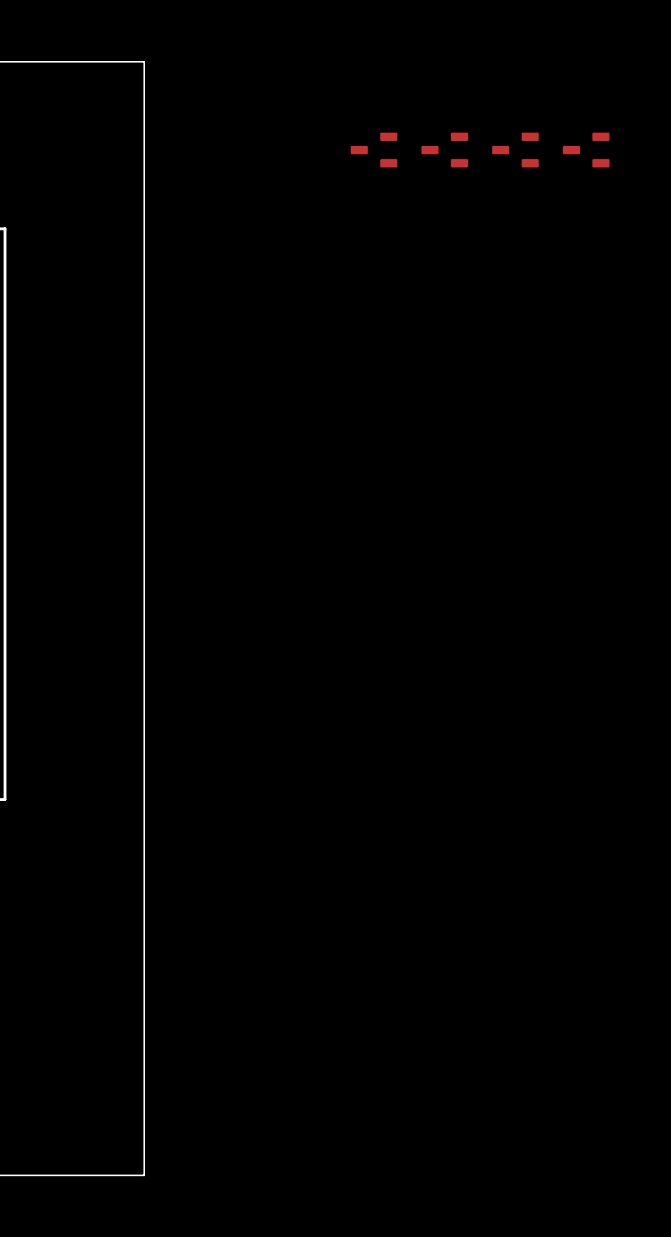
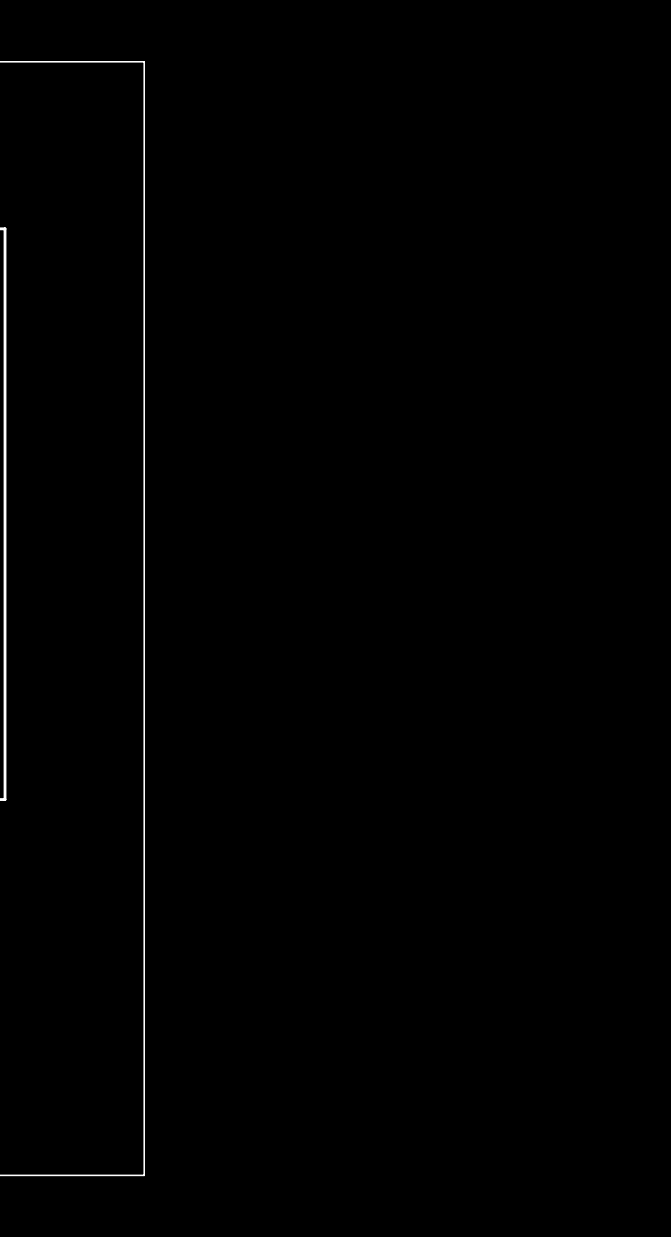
part: (374, 150) -> none
part: (444, 150) -> none
part: (515, 150) -> none
part: (586, 150) -> none

